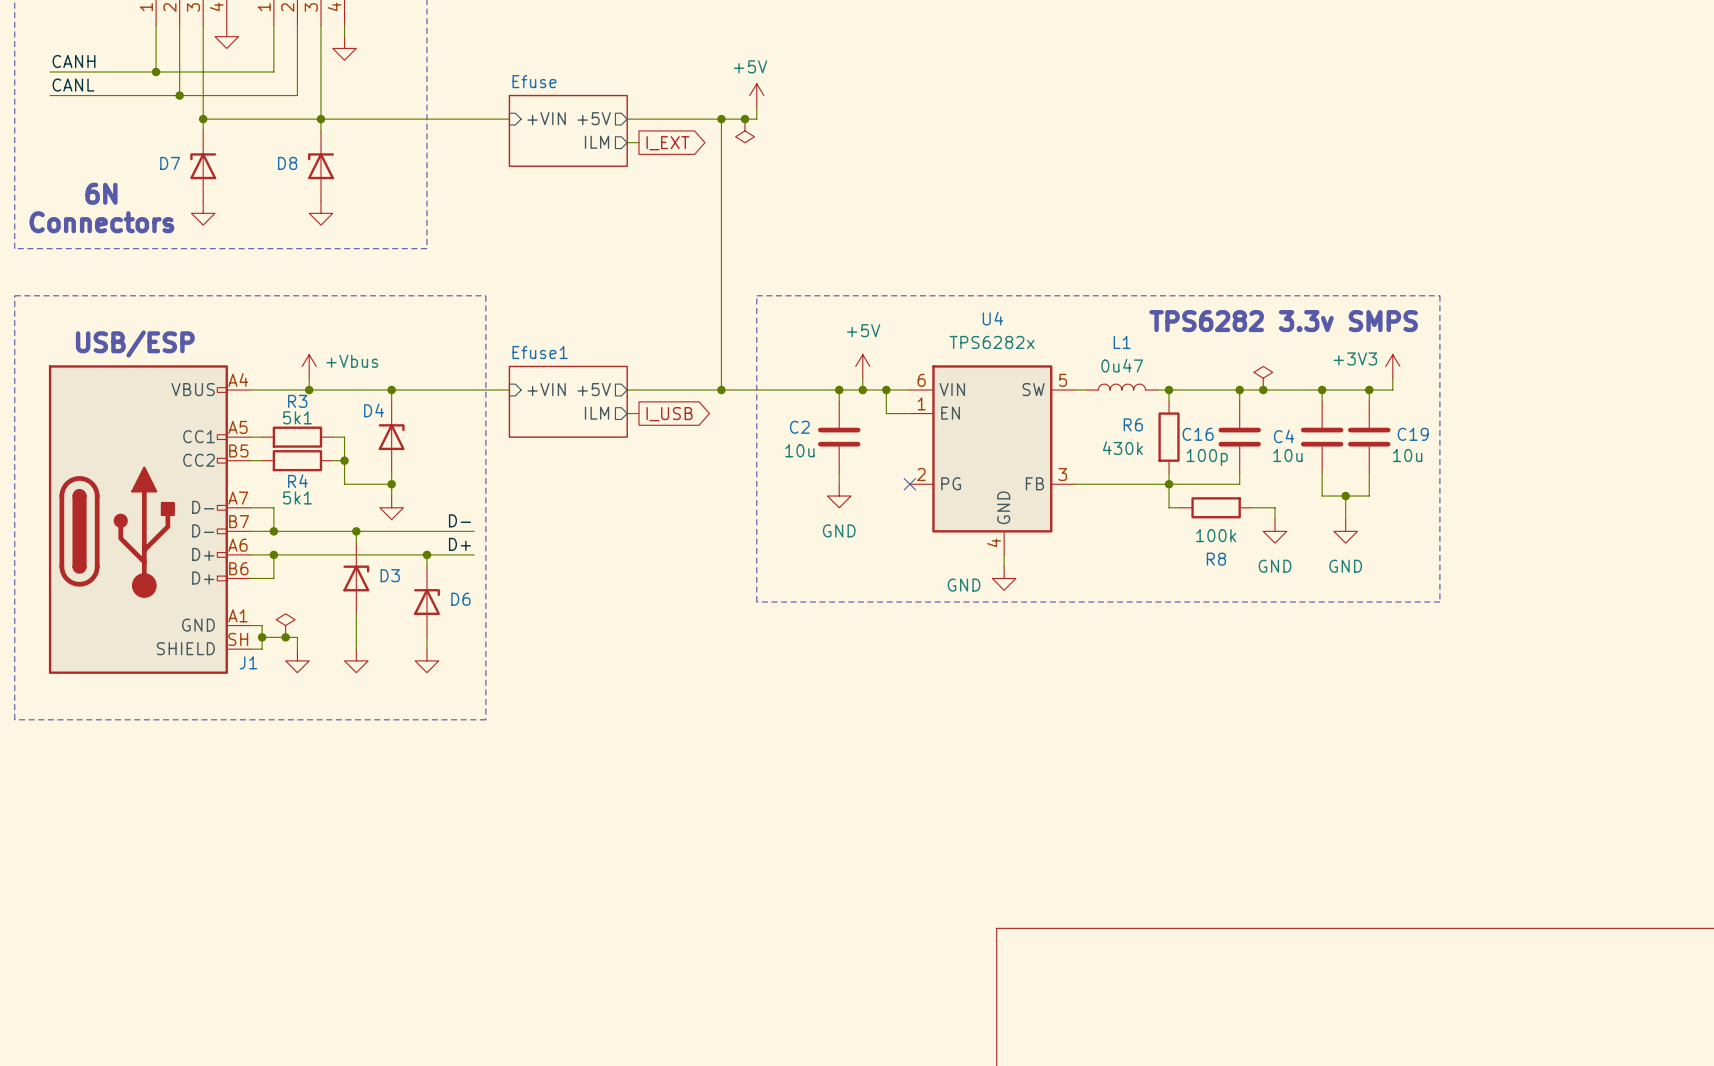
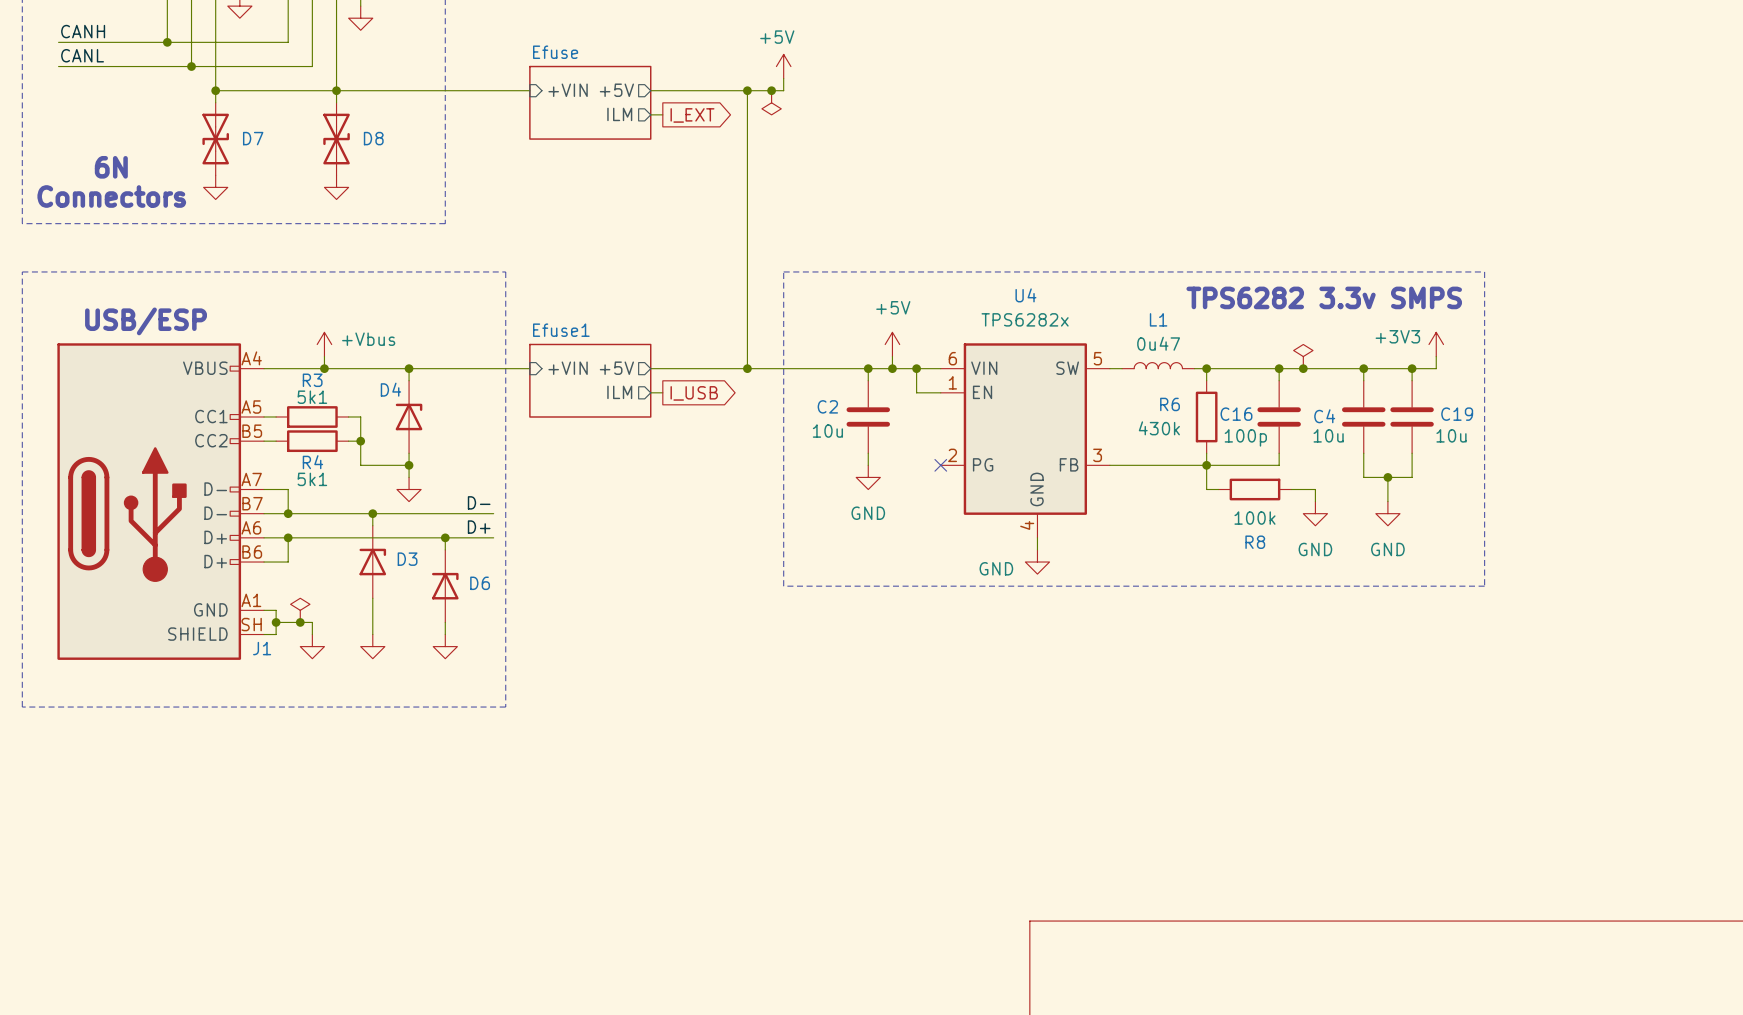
D7 symbol: [190, 130, 217, 202] -> [202, 102, 229, 176]
D8 symbol: [308, 130, 334, 202] -> [323, 102, 350, 176]
D7 name position: D7 (170, 163) -> D7 (253, 138)
D8 name position: D8 (287, 163) -> D8 (373, 138)

